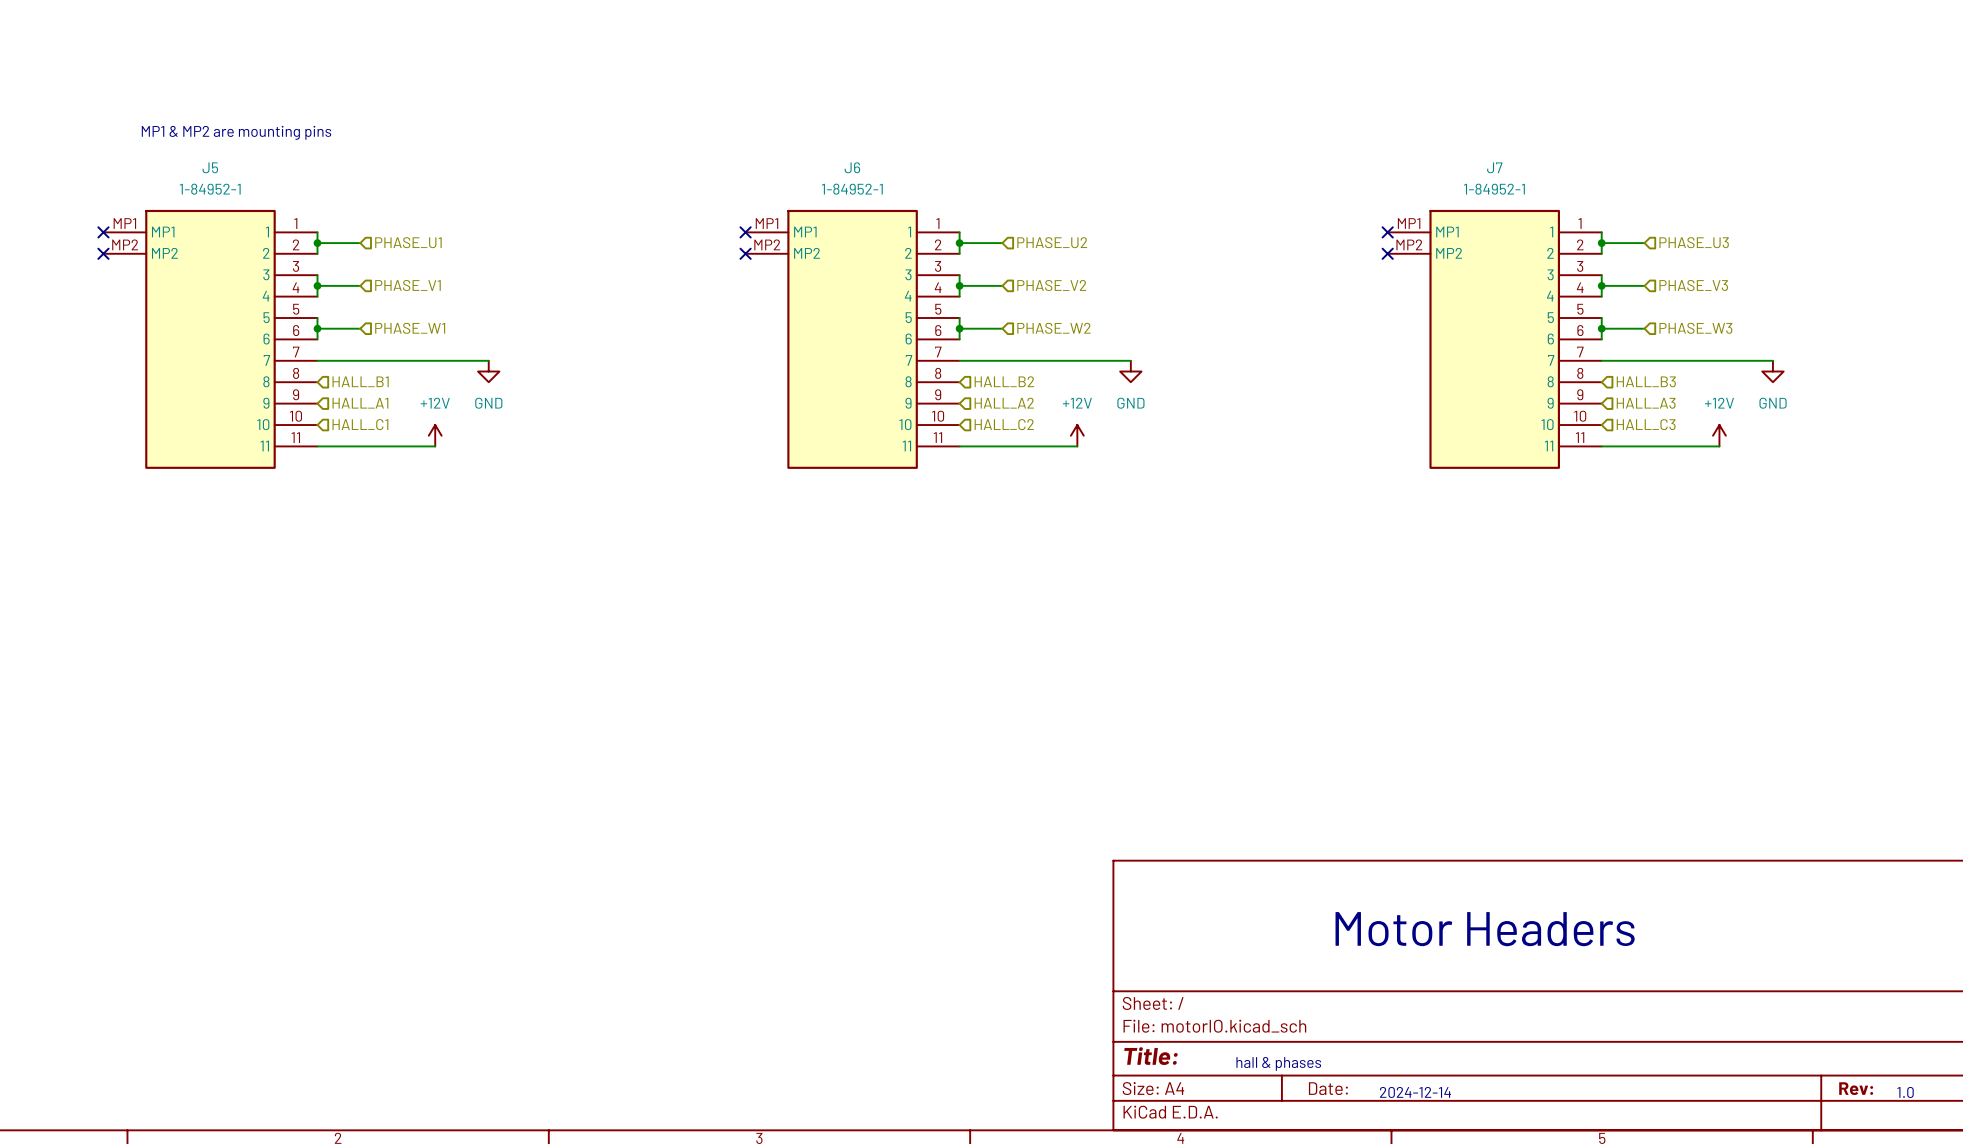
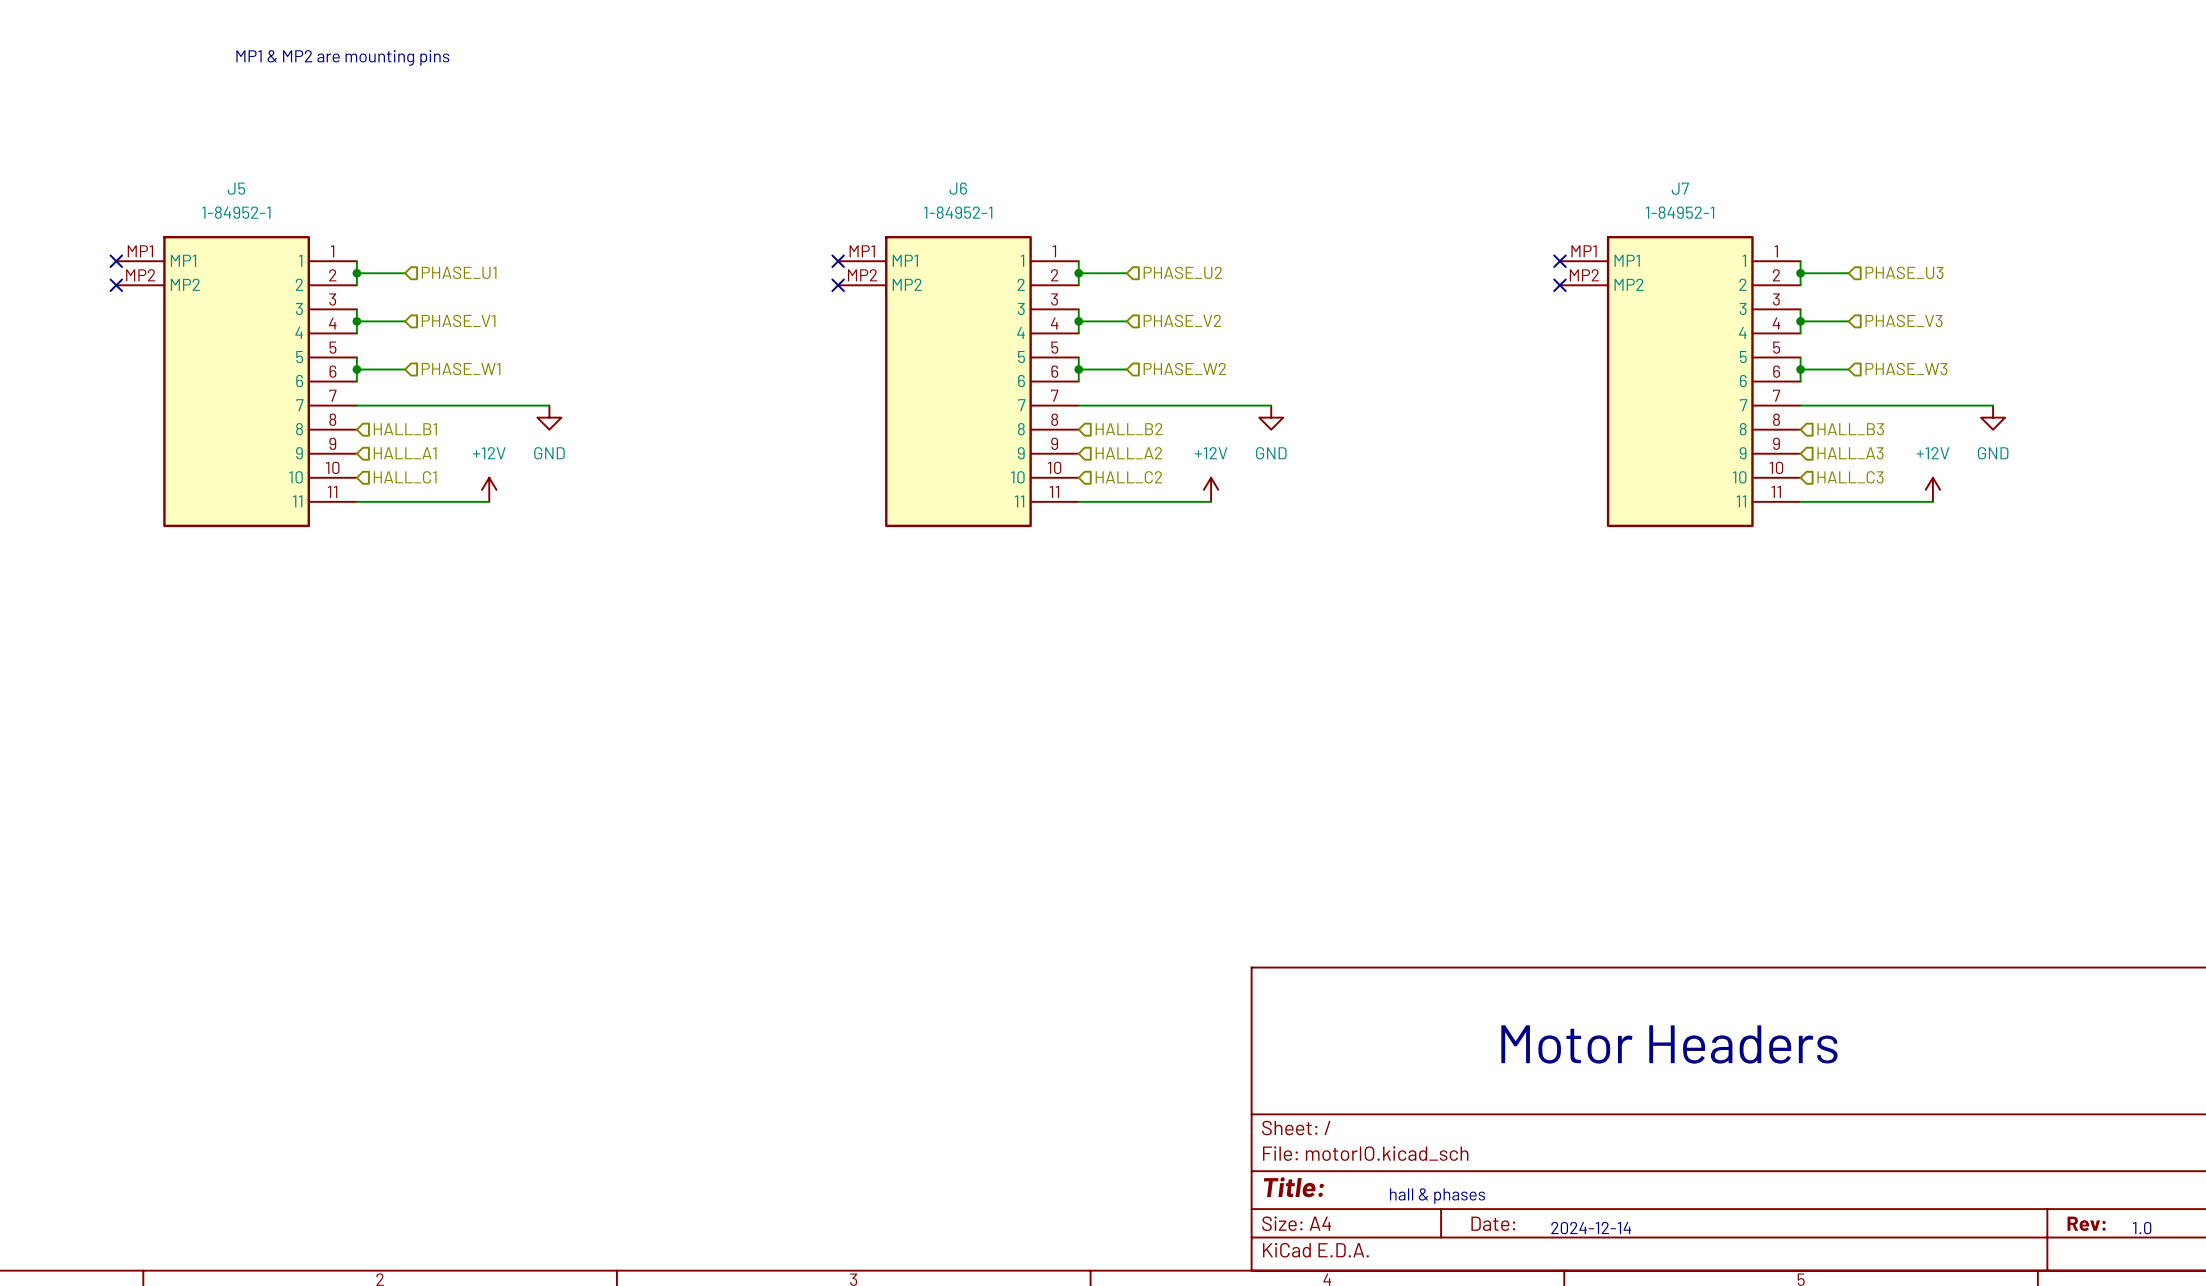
text position: MP1 & MP2 are mounting pins (236, 132) -> MP1 & MP2 are mounting pins (342, 57)

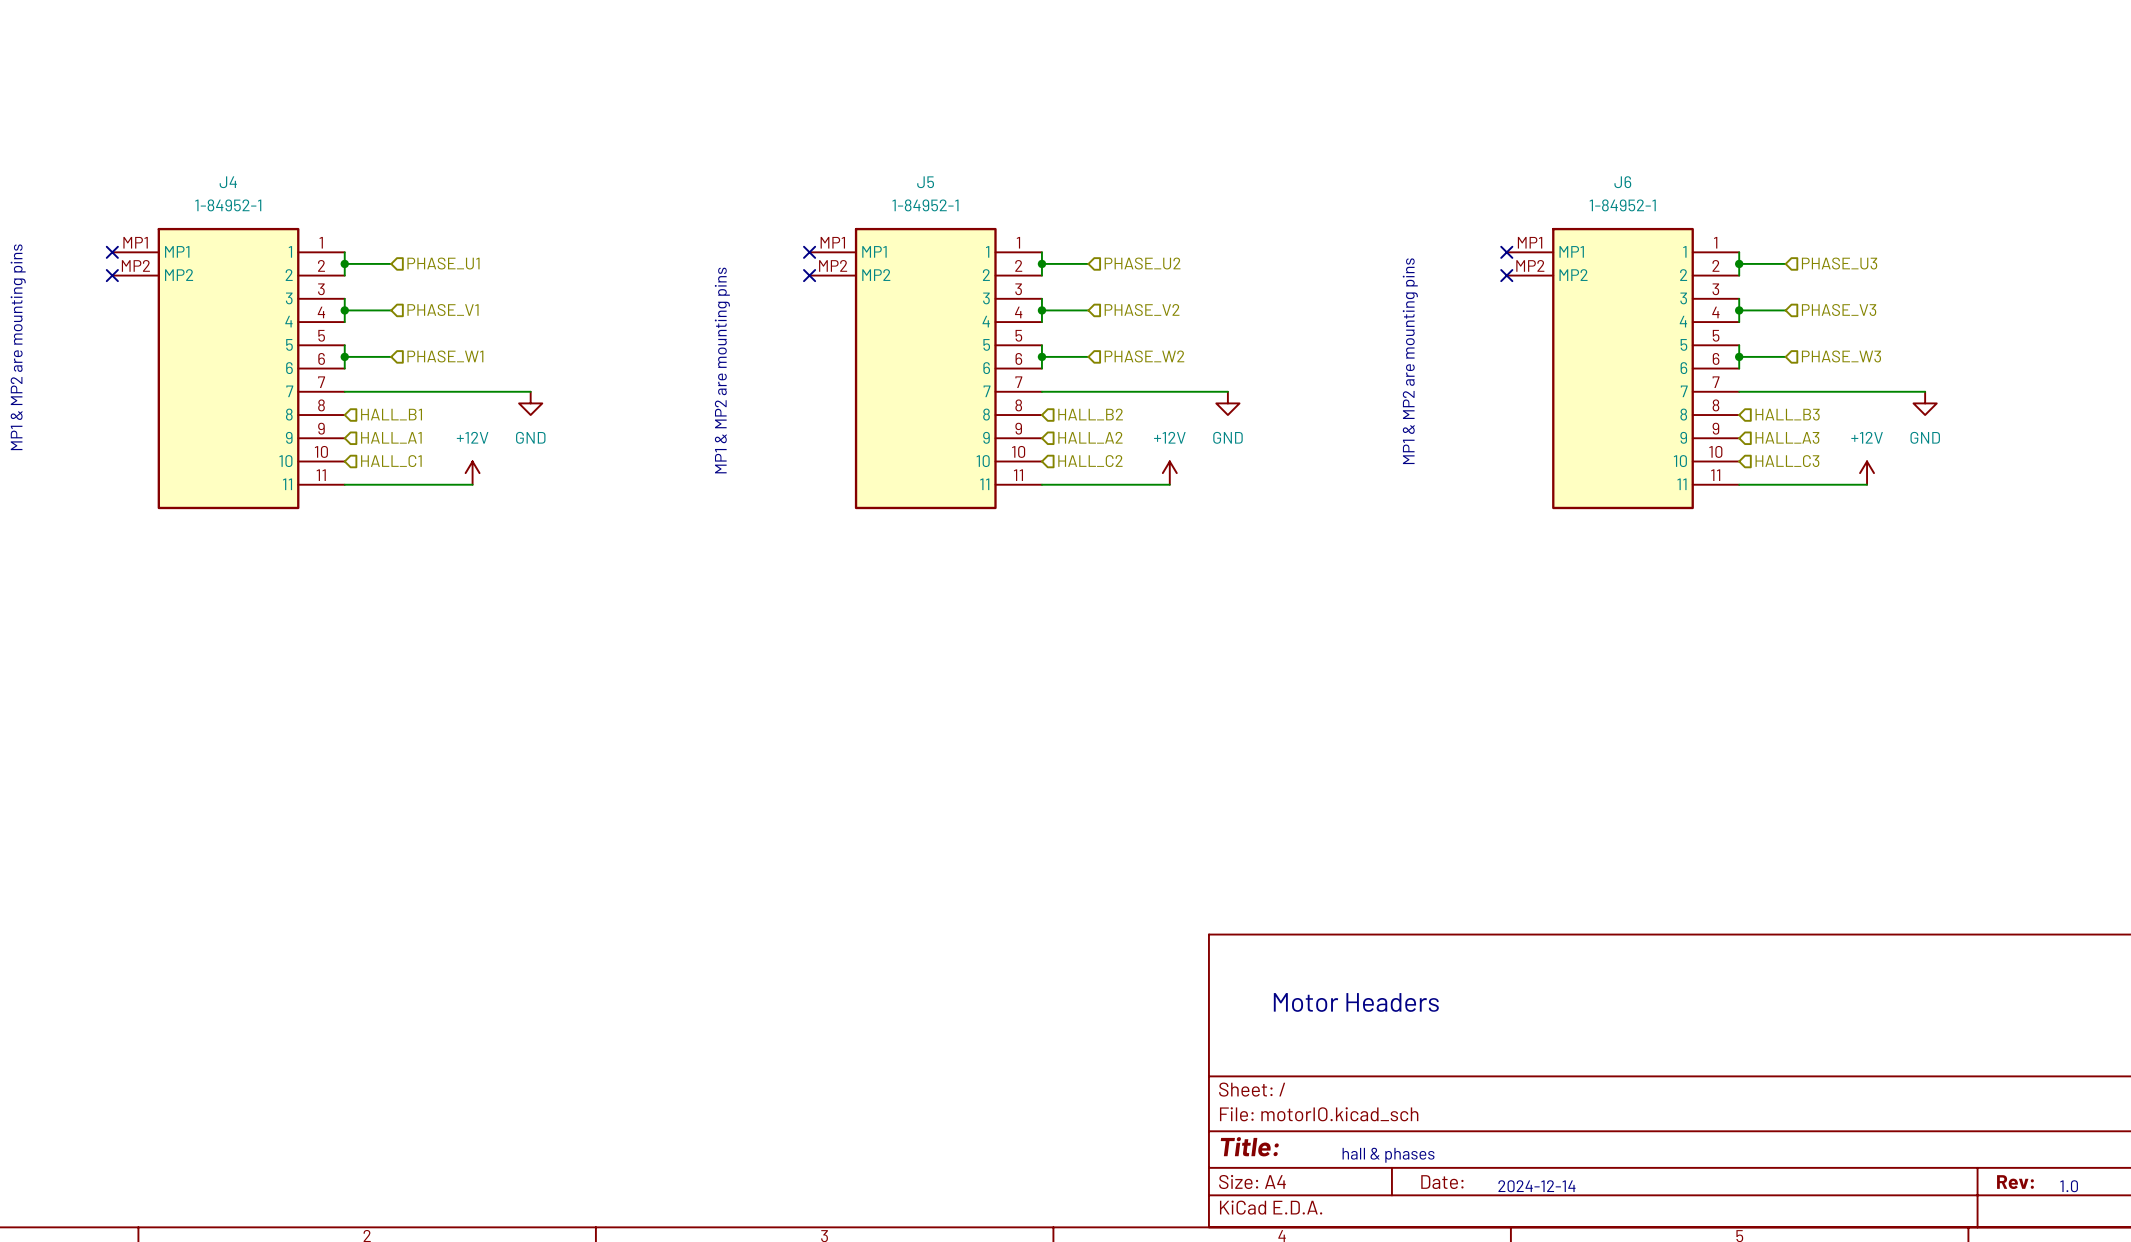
text: MP1 & MP2 are mounting pins (342, 57) -> none
J5 name: J5 (236, 188) -> J4 (228, 182)
J6 name: J6 (958, 188) -> J5 (925, 182)
J7 name: J7 (1680, 188) -> J6 (1622, 182)
text: none -> MP1 & MP2 are mounting pins (18, 347)
text: none -> MP1 & MP2 are mounting pins (1410, 361)
text: none -> MP1 & MP2 are mounting pins (722, 370)
text: none -> Motor Headers (1356, 1002)
text: Motor Headers (1669, 1044) -> none

